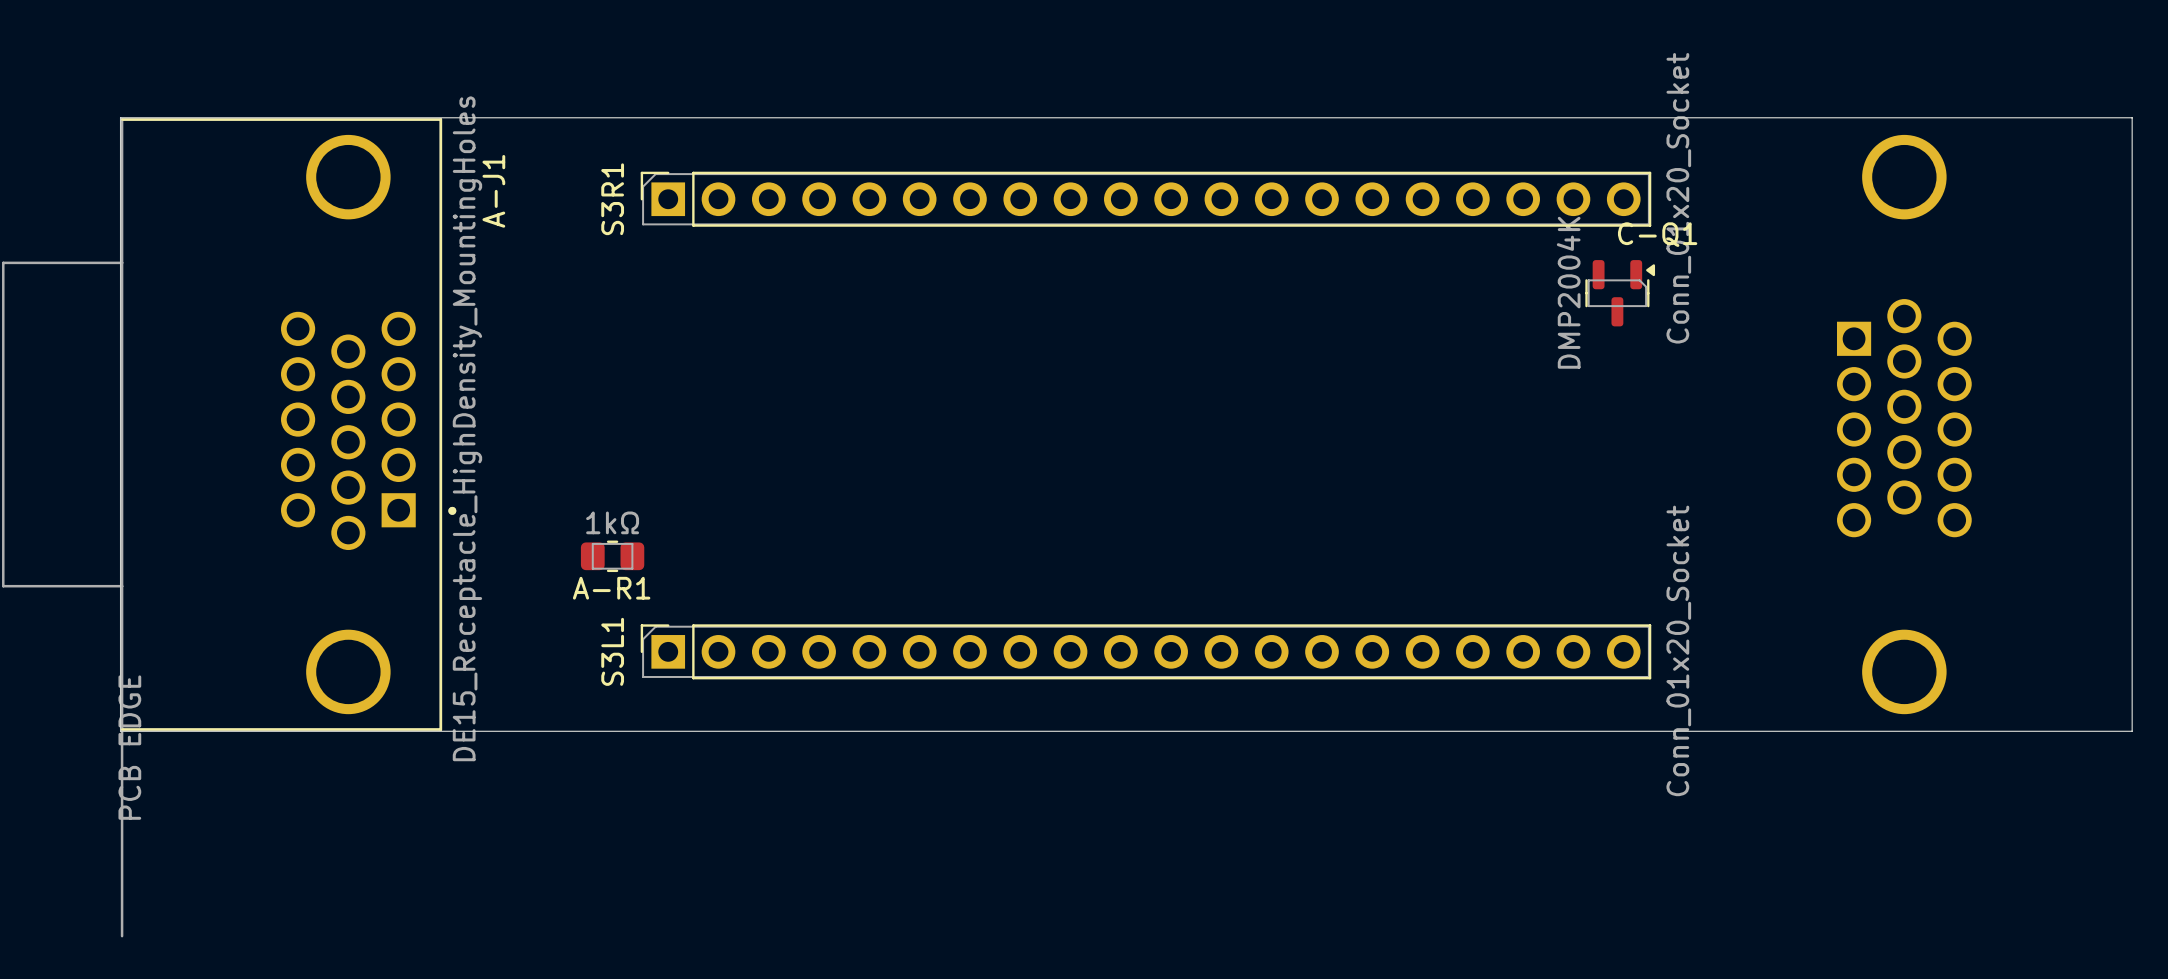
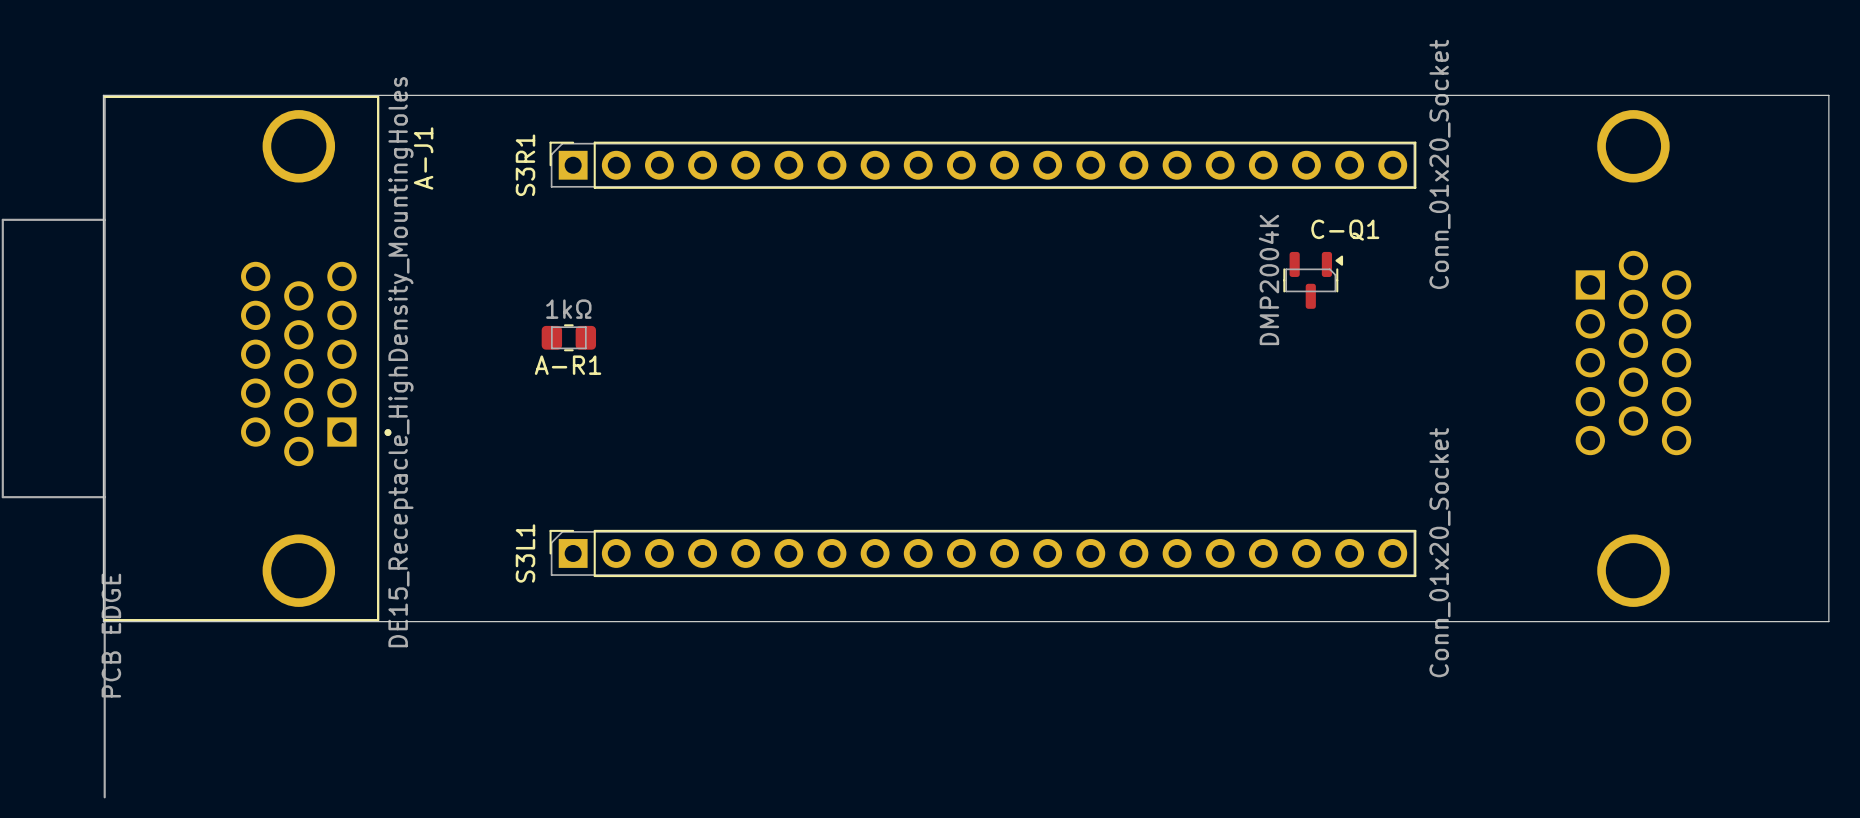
C-Q1 position: (1620, 293) -> (1313, 280)
A-R1 position: (612, 556) -> (568, 337)

